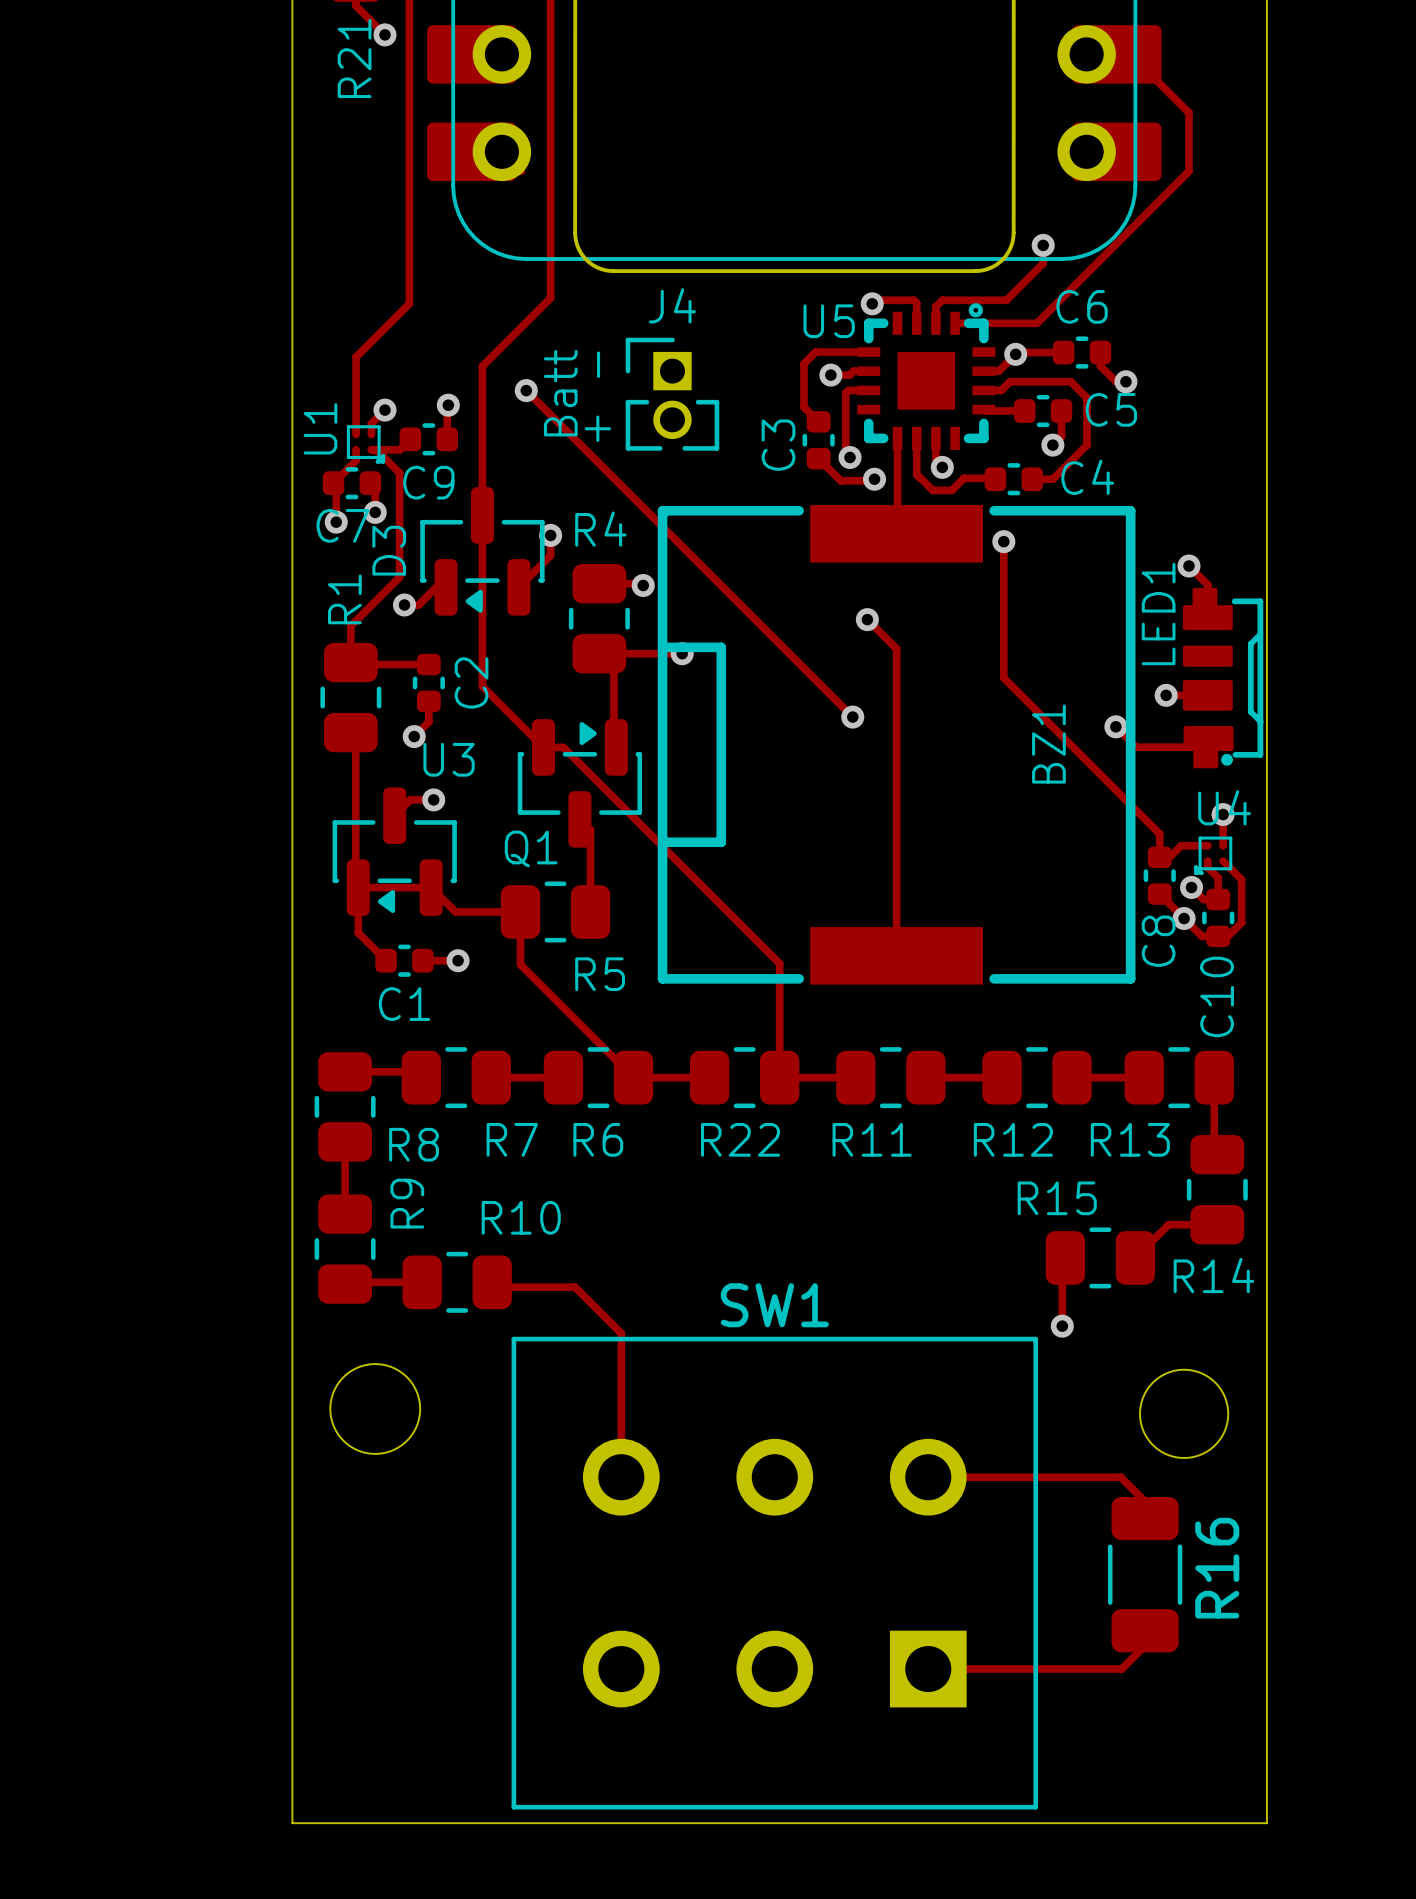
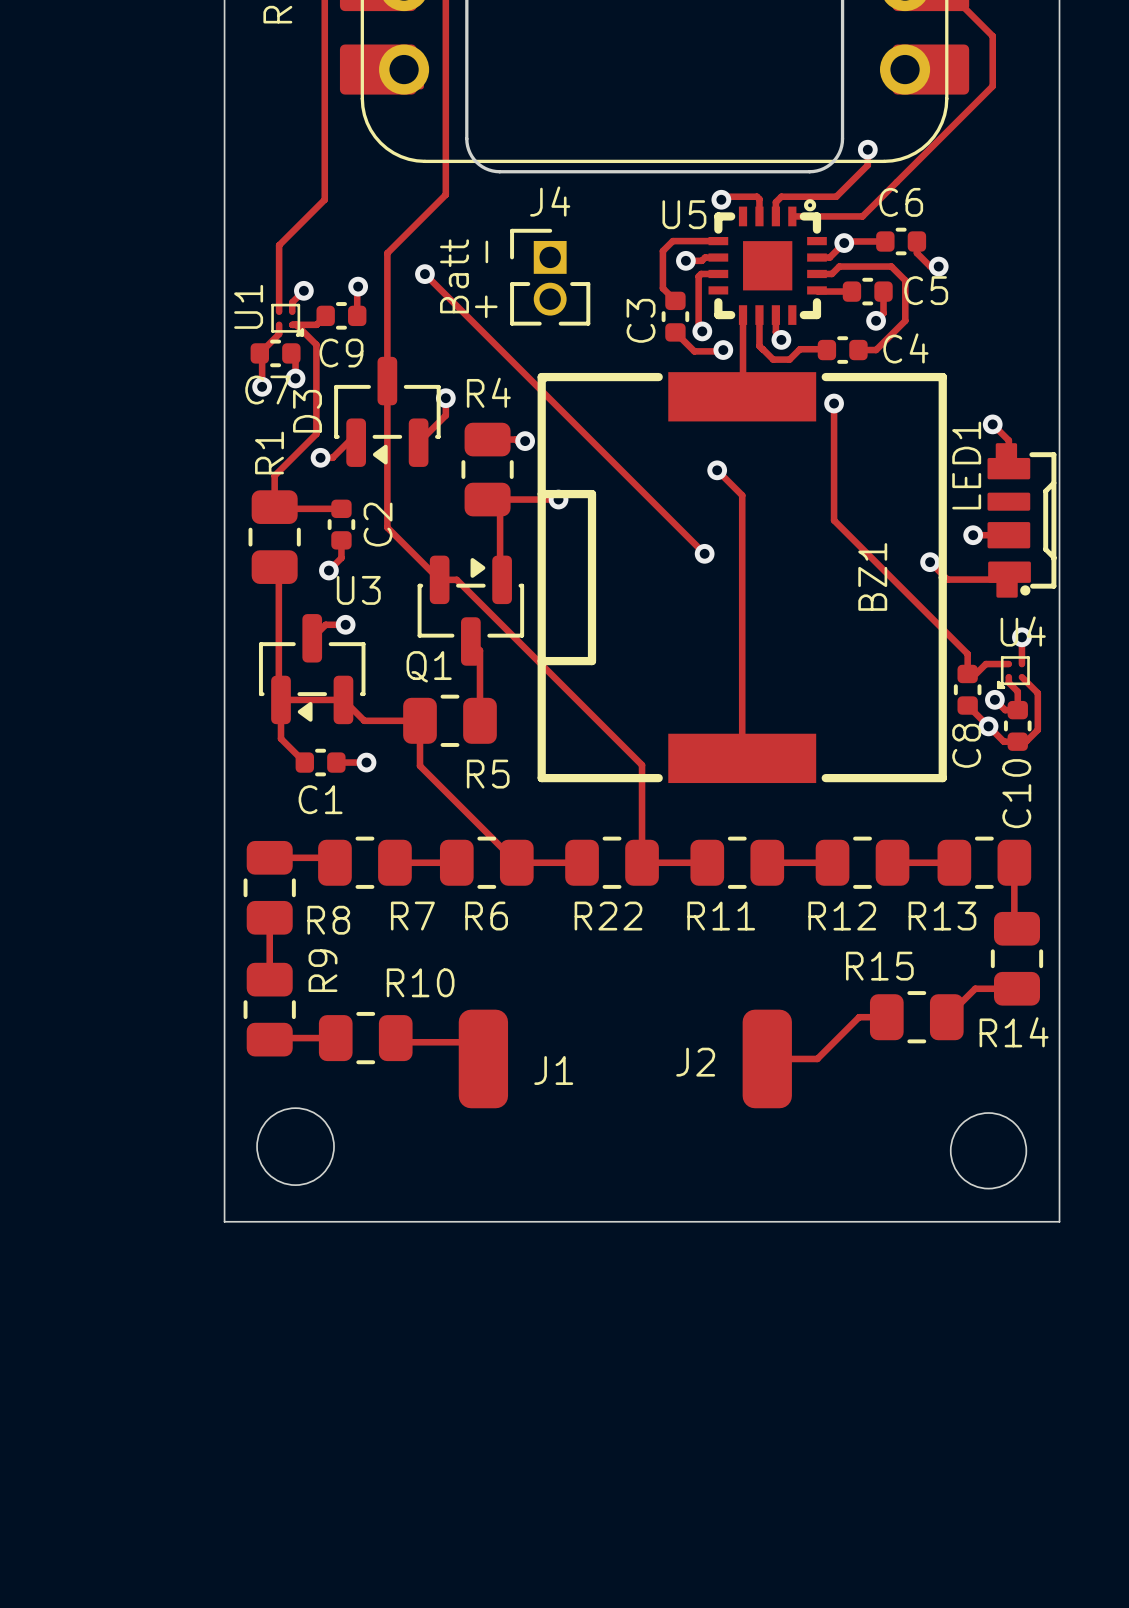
track: (1065, 1257) (1062, 1261) (1062, 1326) -> (886, 1017) (859, 1017) (817, 1058) (767, 1058)
track: (594, 1306) (621, 1333) (621, 1477) -> none
J1: none -> (483, 1058)
J2: none -> (767, 1058)
via: (1062, 1326) -> none
track: (928, 1477) (1120, 1477) (1144, 1501) (1144, 1533) -> none
board edge: (292, 1496) (292, 1823) (1266, 1823) (1266, 1496) -> (224, 1221) (1059, 1221)
SW1: (774, 1573) -> none
R16: (1145, 1574) -> none
track: (1144, 1646) (1121, 1669) (928, 1669) -> none

